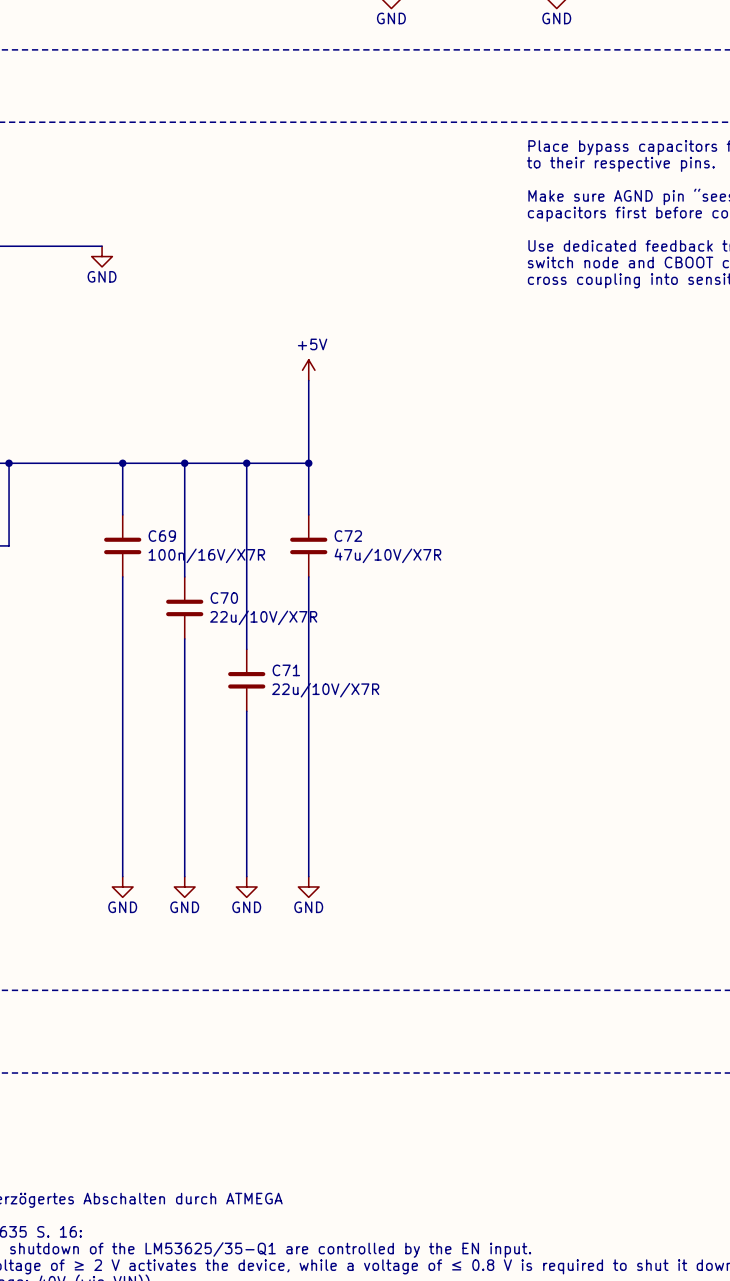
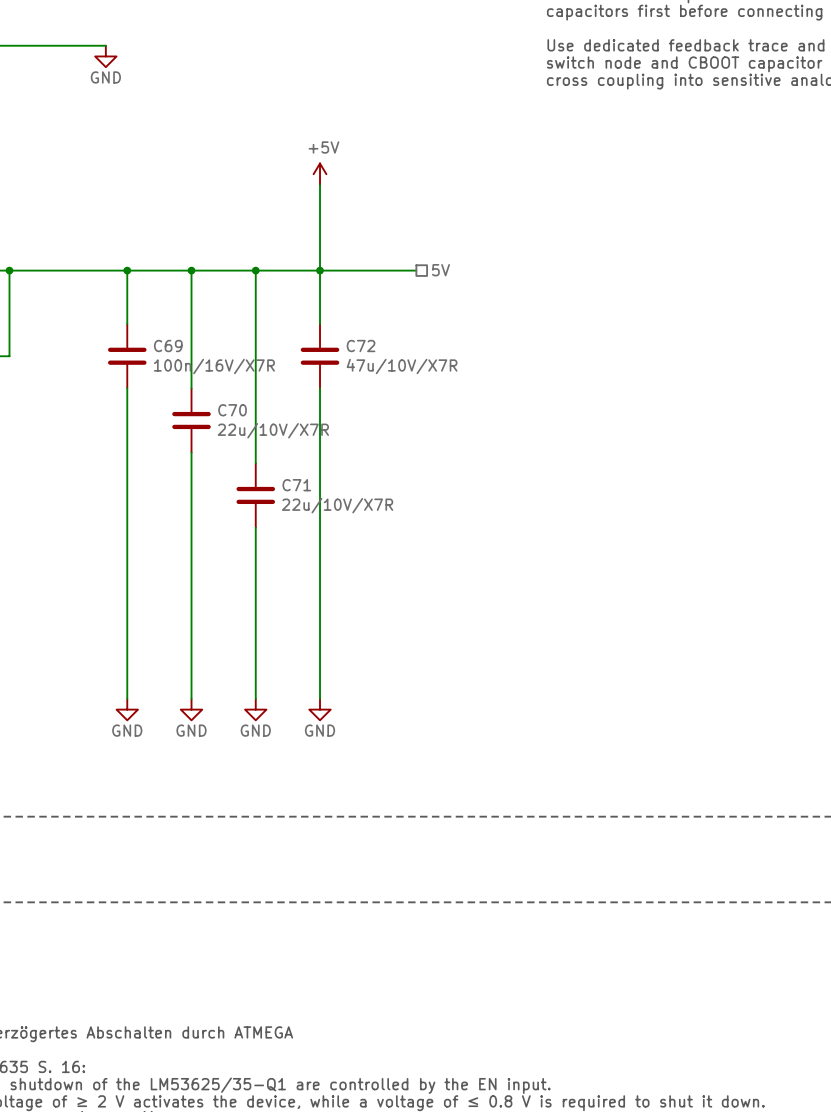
hierarchical label: none -> 5V (441, 270)
wire: none -> (320, 270) (416, 270)

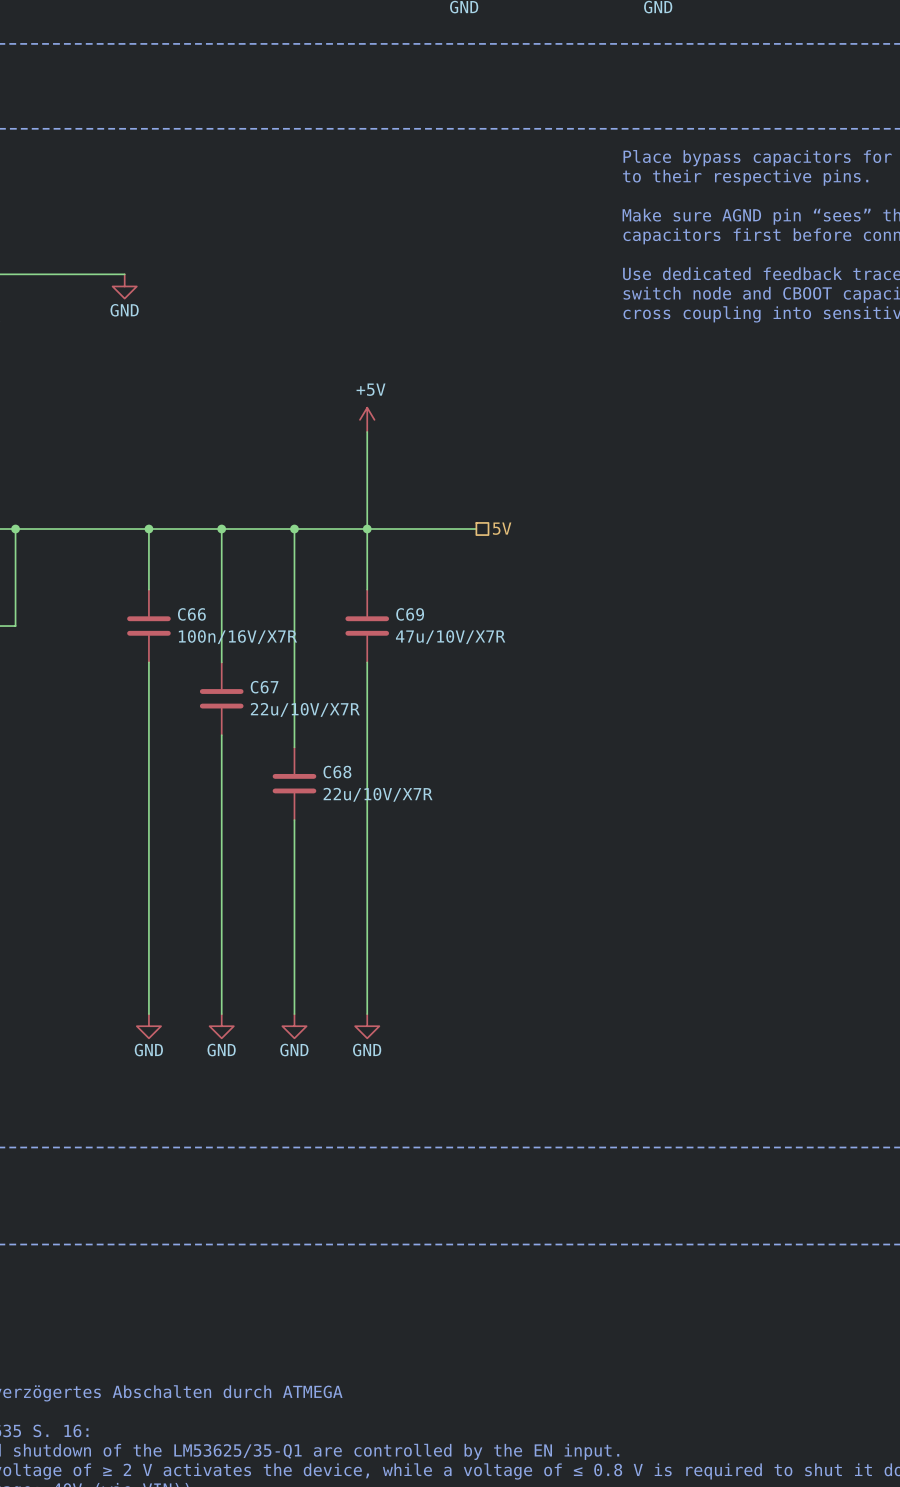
C69 name: C69 (168, 346) -> C66 (191, 614)
C72 name: C72 (361, 346) -> C69 (410, 614)
C70 name: C70 (232, 410) -> C67 (264, 687)
C71 name: C71 (296, 485) -> C68 (337, 772)

